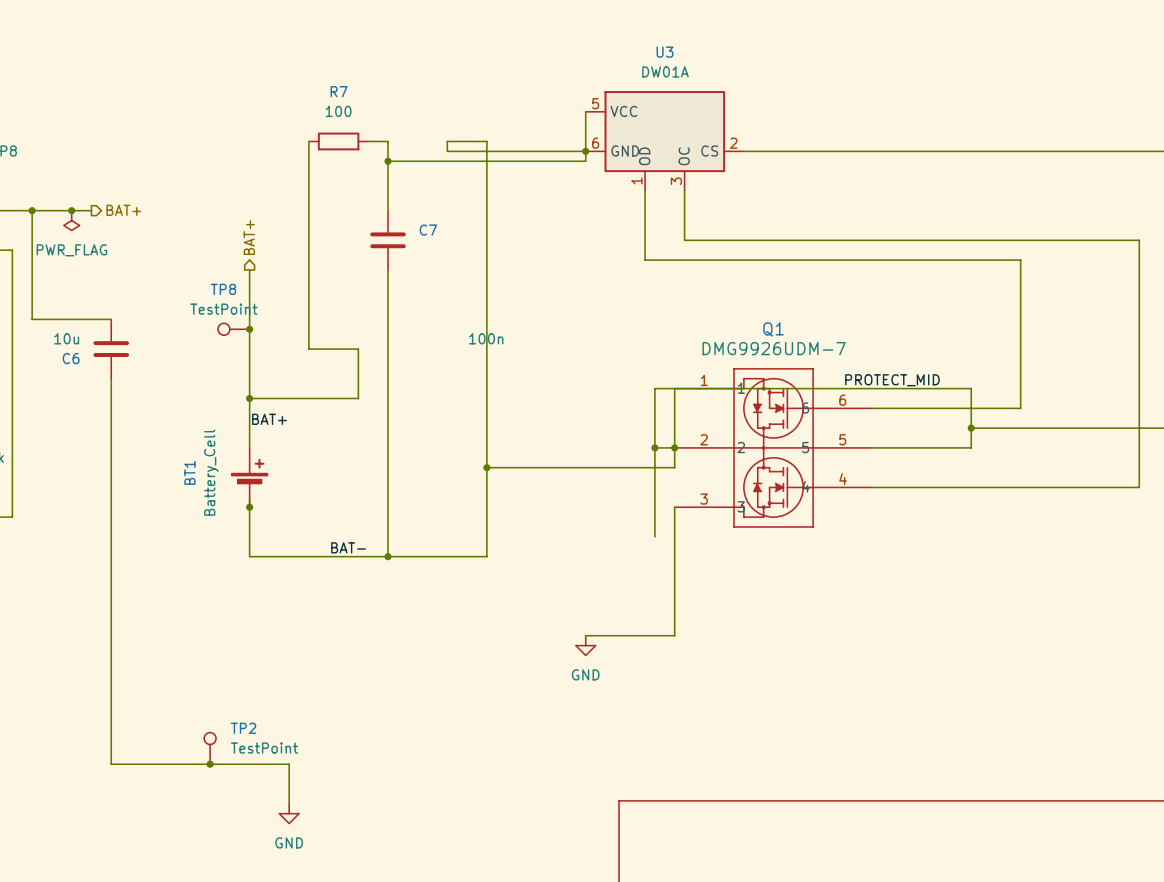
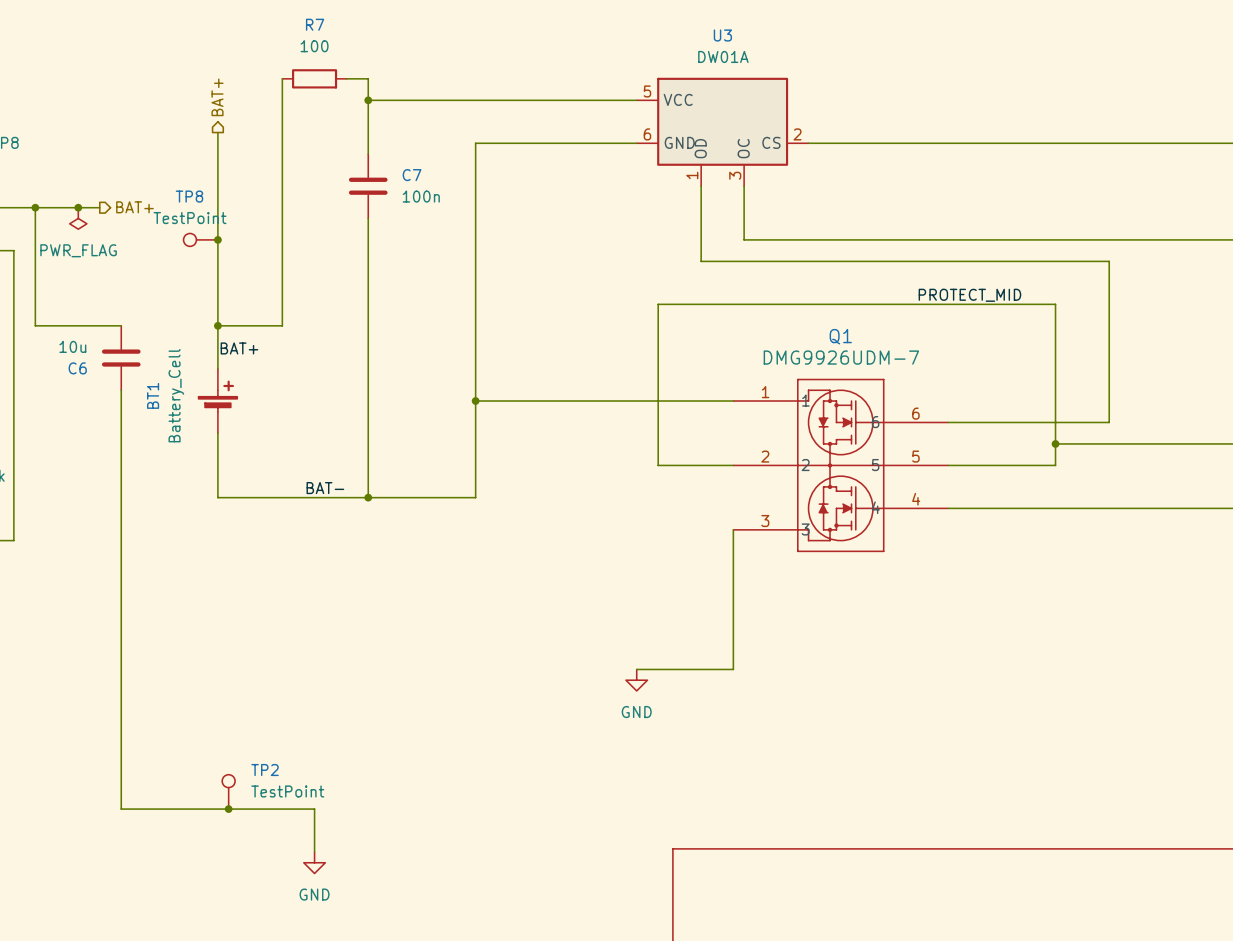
wire: none -> (282, 78) (282, 325) (217, 325)
junction: none -> (368, 100)
wire: (585, 111) (585, 161) (388, 161) -> (636, 100) (368, 100)
wire: none -> (217, 132) (217, 368)
wire: (308, 141) (308, 349) (358, 349) (358, 398) (249, 398) -> none
R7 position: (338, 141) -> (314, 78)
wire: (368, 141) (388, 141) (388, 210) -> (346, 78) (368, 78) (368, 154)
wire: (447, 151) (447, 141) (486, 141) (486, 556) (249, 556) (249, 497) -> (486, 143) (475, 143) (475, 497) (217, 497) (217, 433)
junction: (585, 151) -> none
junction: (388, 161) -> none
wire: none -> (368, 218) (368, 497)
hierarchical label position: BAT+ (249, 237) -> BAT+ (217, 97)
junction: none -> (217, 239)
C7 position: (388, 240) -> (368, 186)
wire: (249, 269) (249, 447) -> none
wire: (388, 269) (388, 556) -> none
junction: none -> (217, 325)
TP8 position: (233, 329) -> (200, 239)
junction: (249, 329) -> none
C7 value position: 100n (486, 338) -> 100n (421, 196)
label position: PROTECT_MID (892, 380) -> PROTECT_MID (969, 295)
junction: none -> (475, 401)
wire: (654, 388) (654, 536) -> (711, 401) (475, 401)
wire: (971, 388) (674, 388) (674, 467) (486, 467) -> (1055, 401) (1055, 304) (658, 304) (658, 465) (711, 465)
junction: (249, 398) -> none
label position: BAT+ (269, 419) -> BAT+ (239, 348)
junction: (654, 447) -> none
junction: (674, 447) -> none
junction: (486, 467) -> none
BT1 position: (249, 477) -> (217, 401)
junction: none -> (368, 497)
junction: (249, 507) -> none
label position: BAT- (348, 547) -> BAT- (325, 488)
junction: (388, 556) -> none

